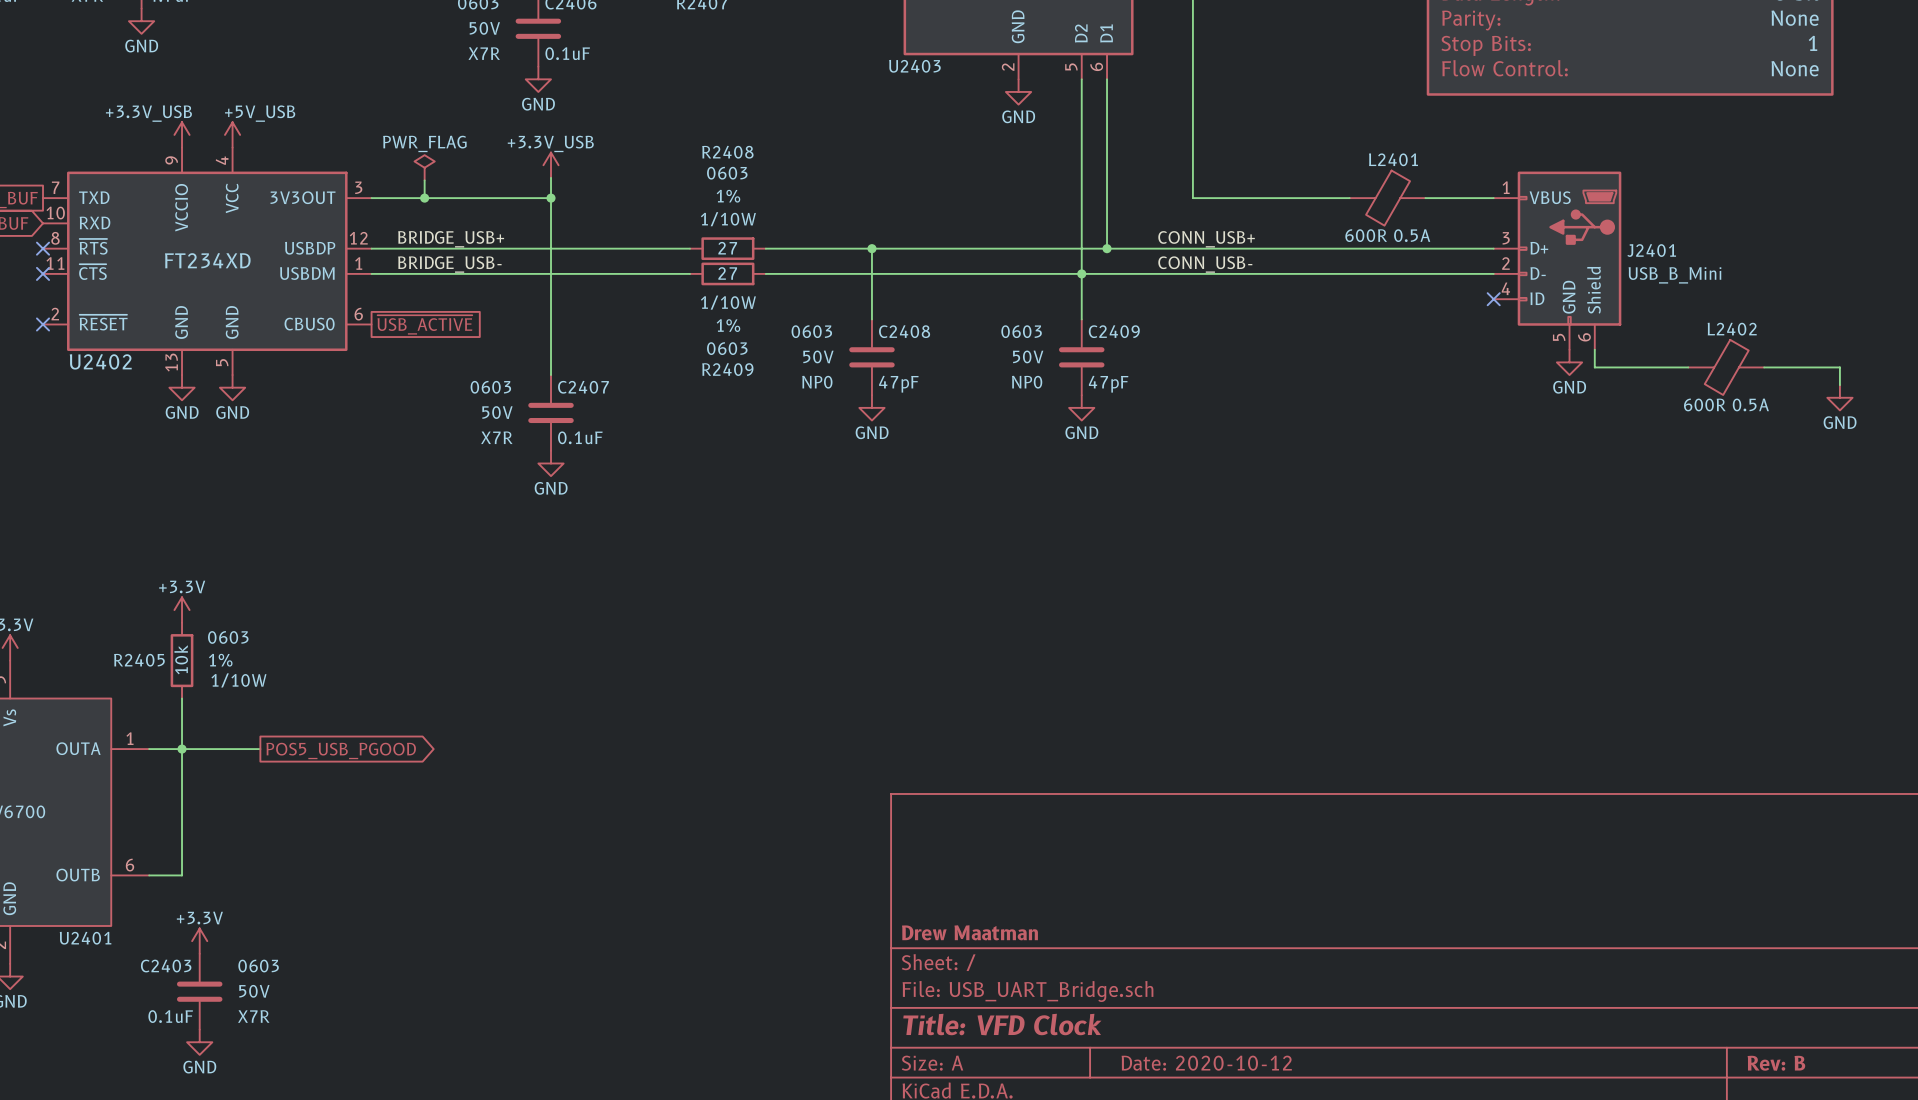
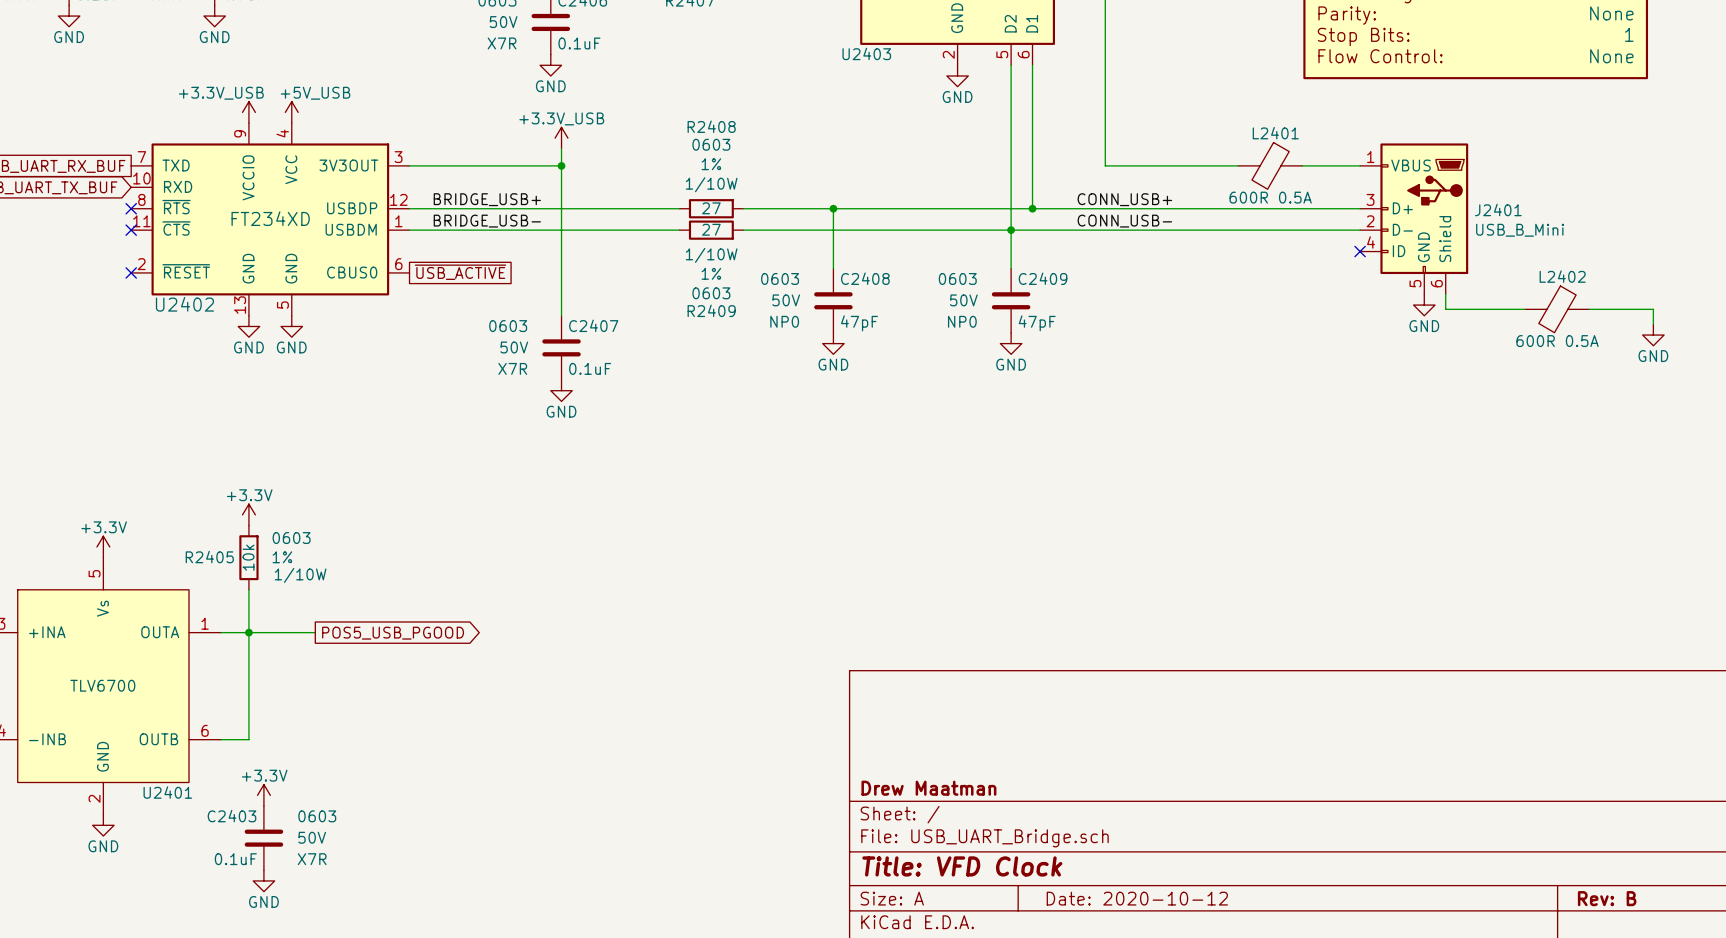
power symbol: PWR_FLAG (424, 167) -> none
wire: (424, 180) (424, 198) -> none
junction: (424, 198) -> none

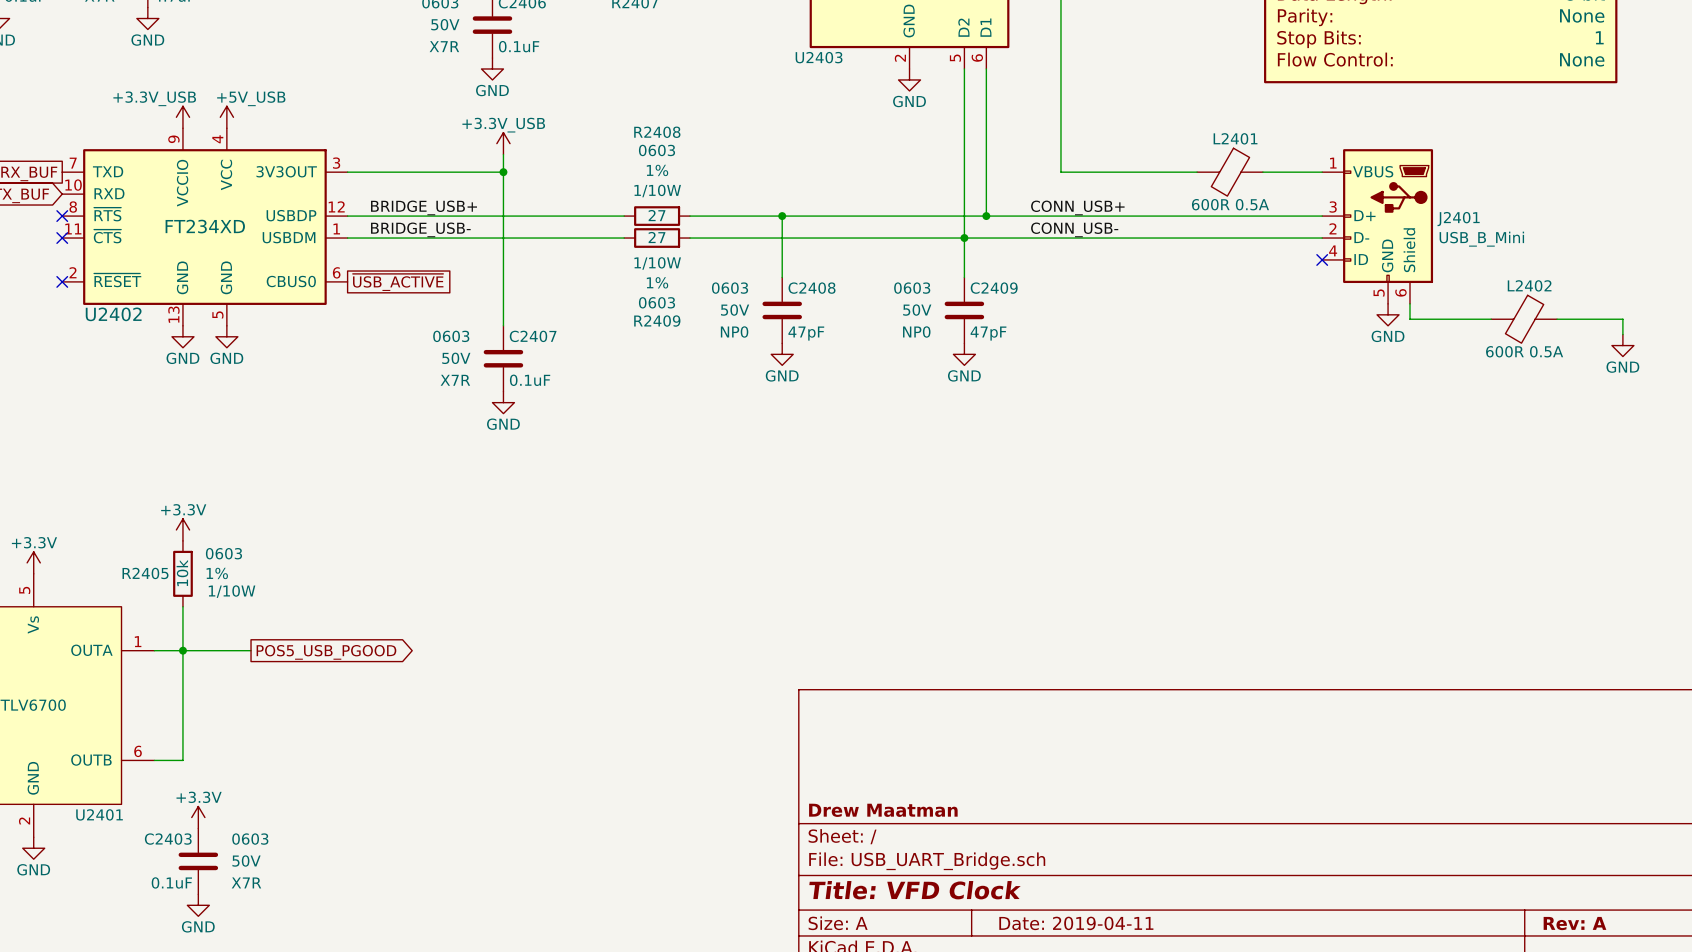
title block: Date: 2020-10-12 (1137, 898) -> Date: 2019-04-11 (1076, 923)
title block: Rev: B (1607, 898) -> Rev: A (1574, 923)

